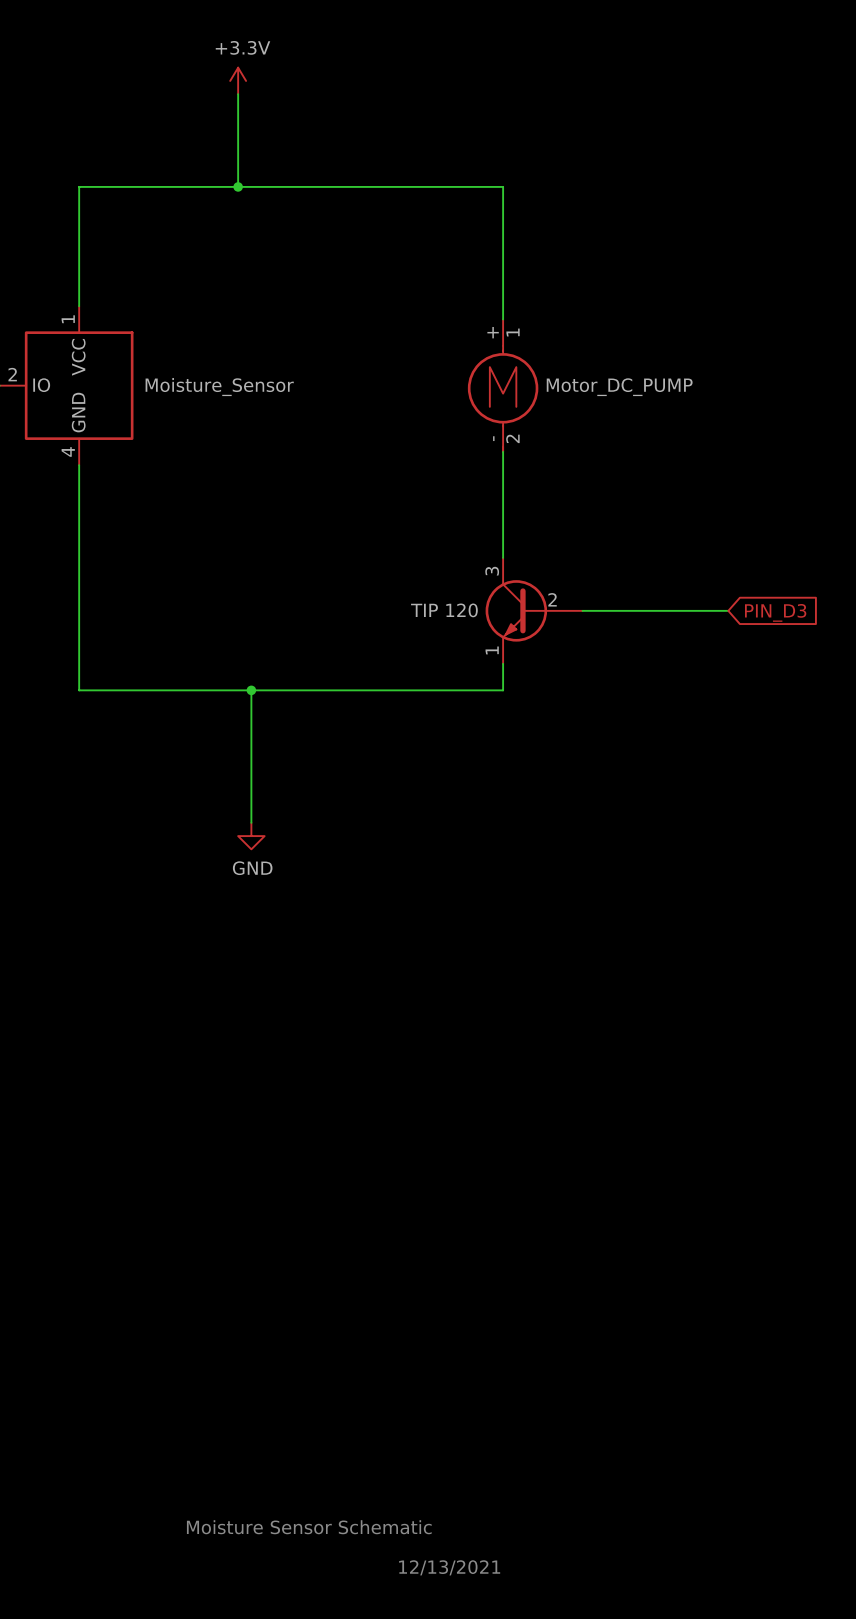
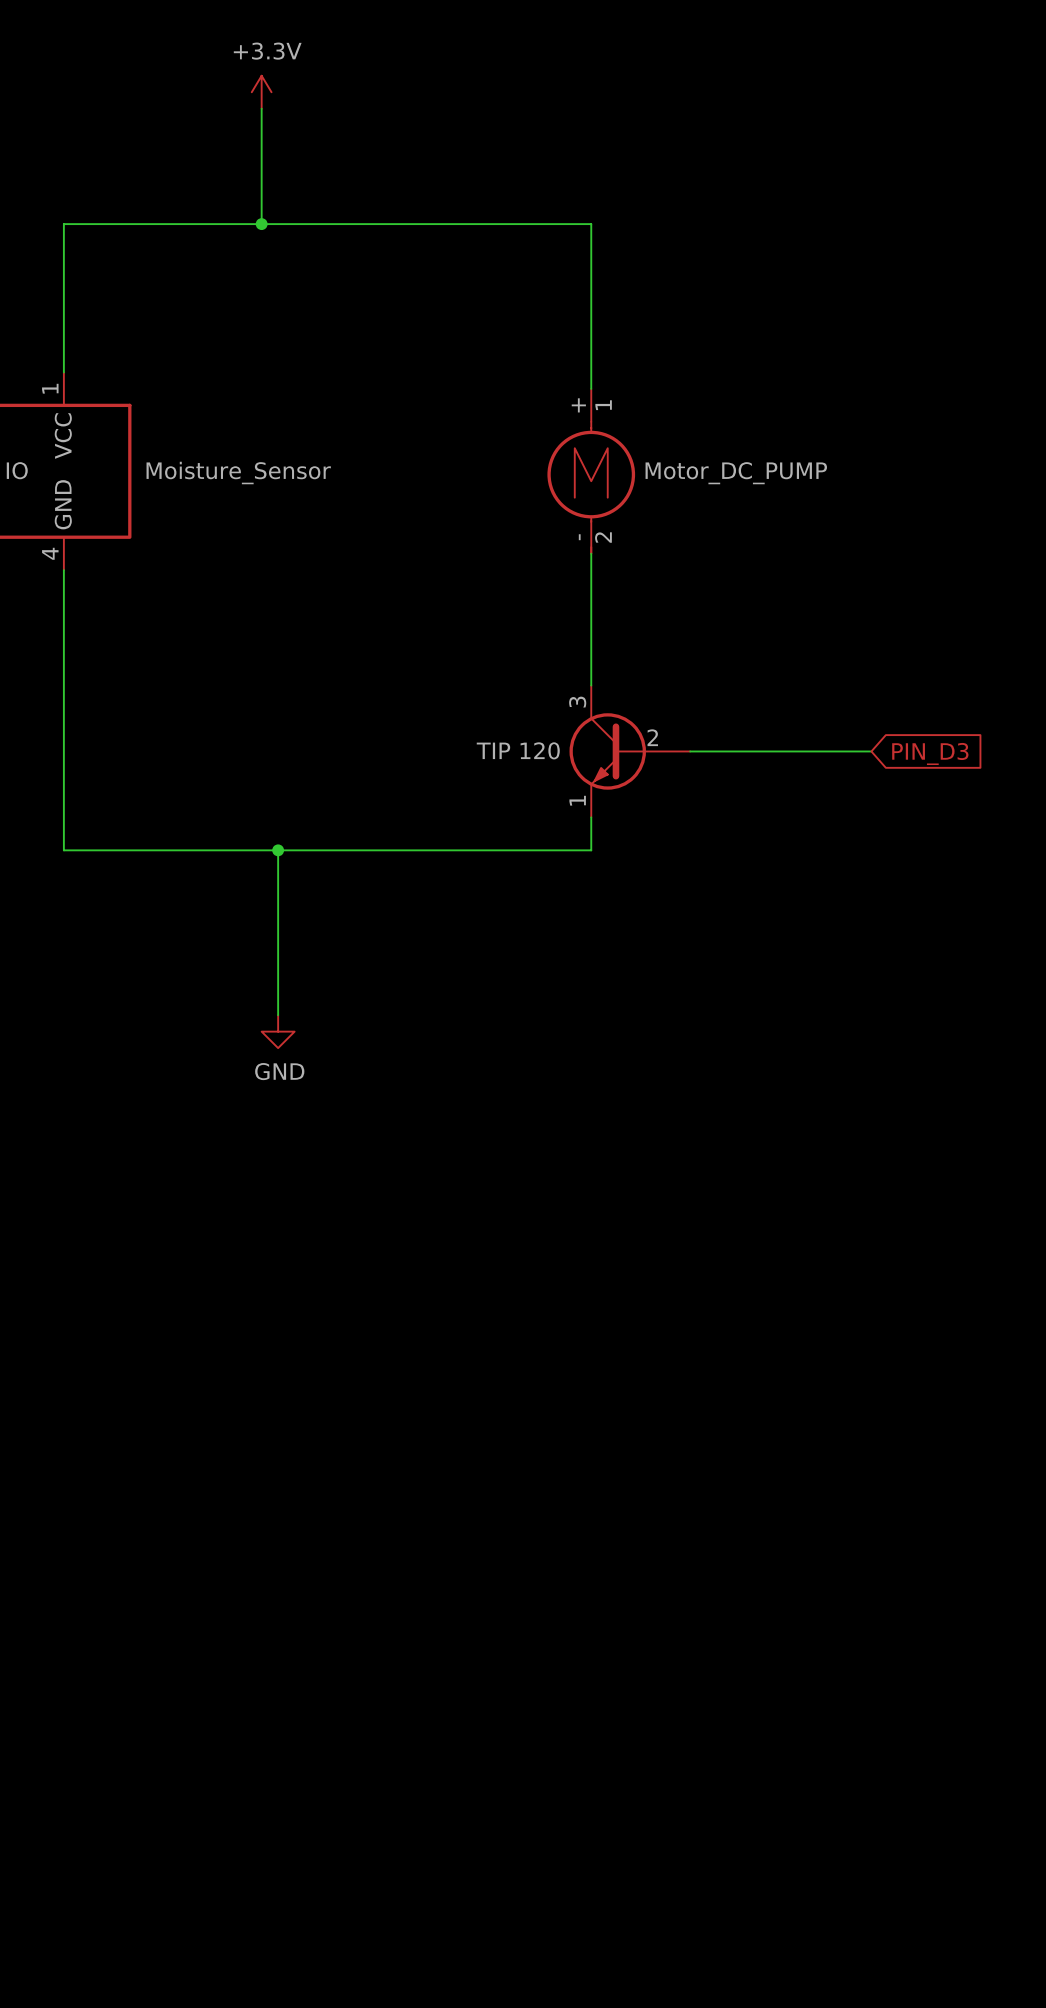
text: Moisture Sensor Schematic (309, 1527) -> none
text: 12/13/2021 (449, 1567) -> none

